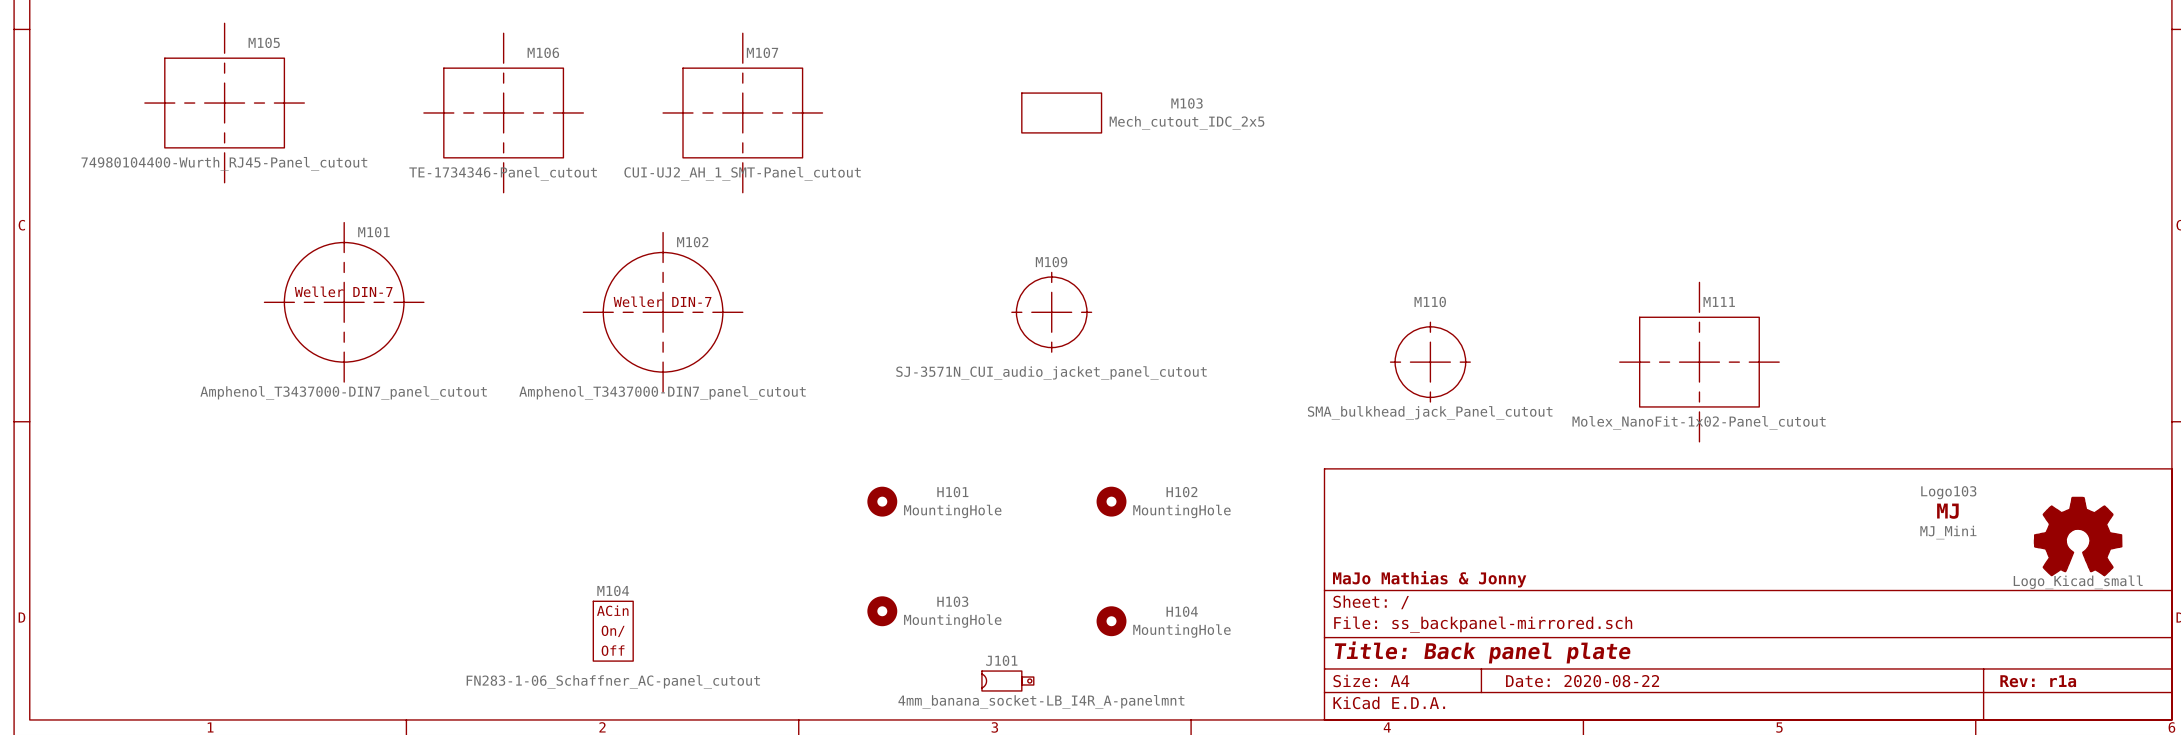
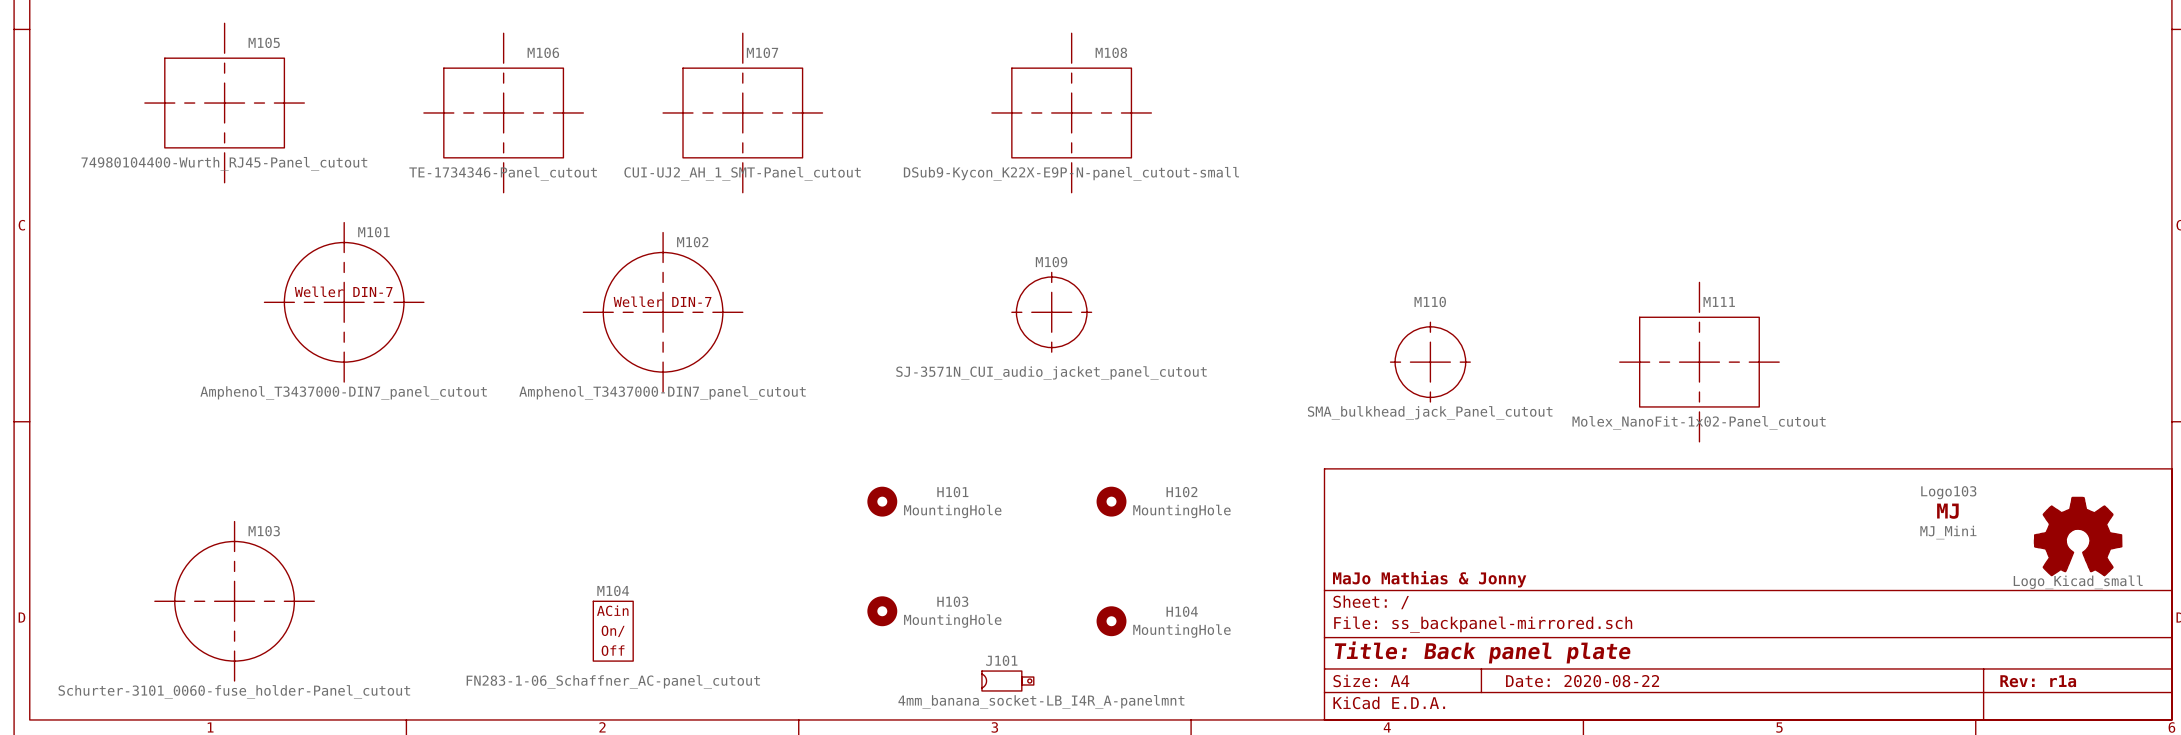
M103 symbol: [1021, 93, 1102, 133] -> [154, 521, 315, 682]
M103 name position: M103 (1187, 103) -> M103 (264, 531)
M108: none -> DSub9-Kycon_K22X-E9P-N-panel_cutout-small (1071, 112)
M103 value: Mech_cutout_IDC_2x5 (1186, 122) -> Schurter-3101_0060-fuse_holder-Panel_cutout (234, 691)

